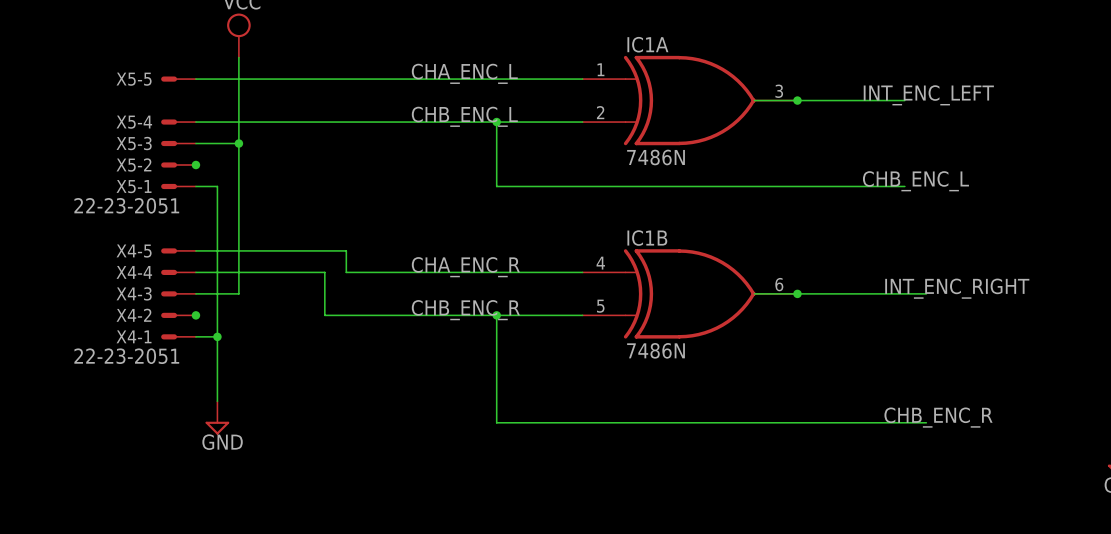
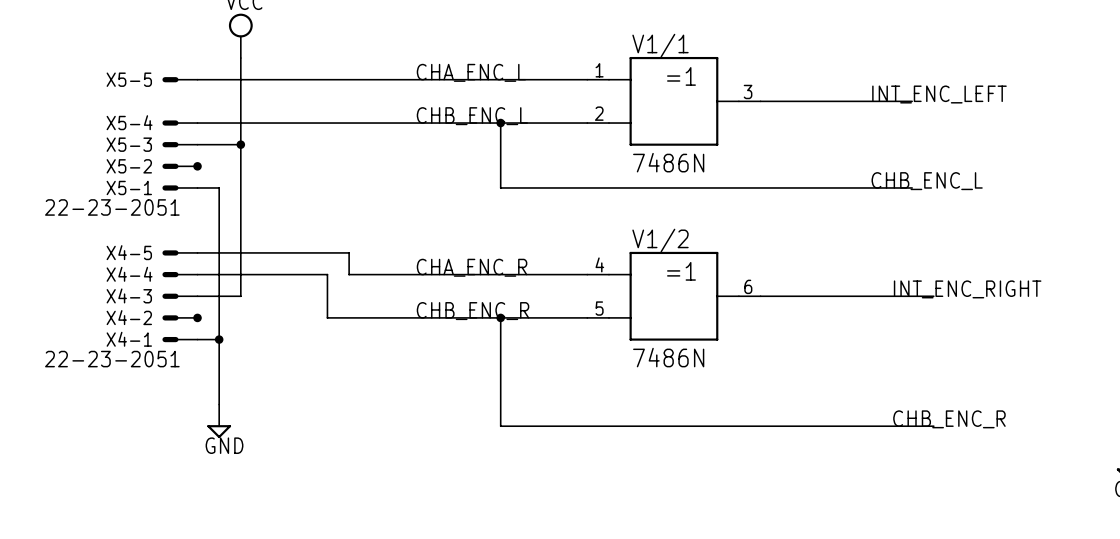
V1/1: none -> 7486N (673, 101)
IC1A: 7486N (690, 100) -> none
junction: (797, 100) -> none
V1/2: none -> 7486N (673, 296)
IC1B: 7486N (690, 293) -> none
junction: (797, 293) -> none

